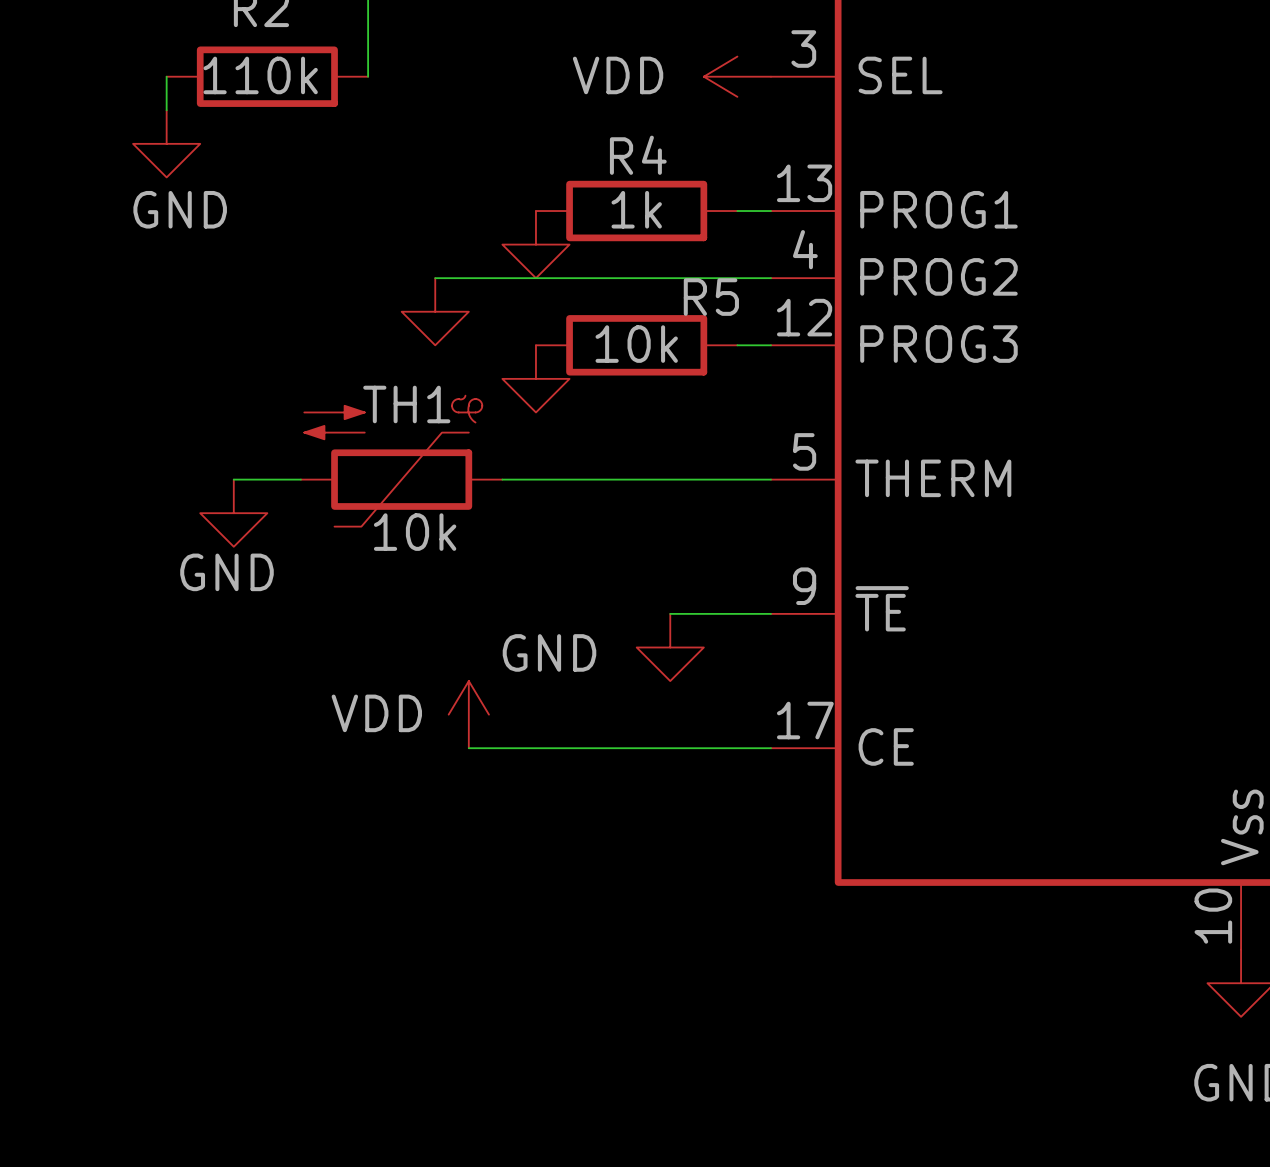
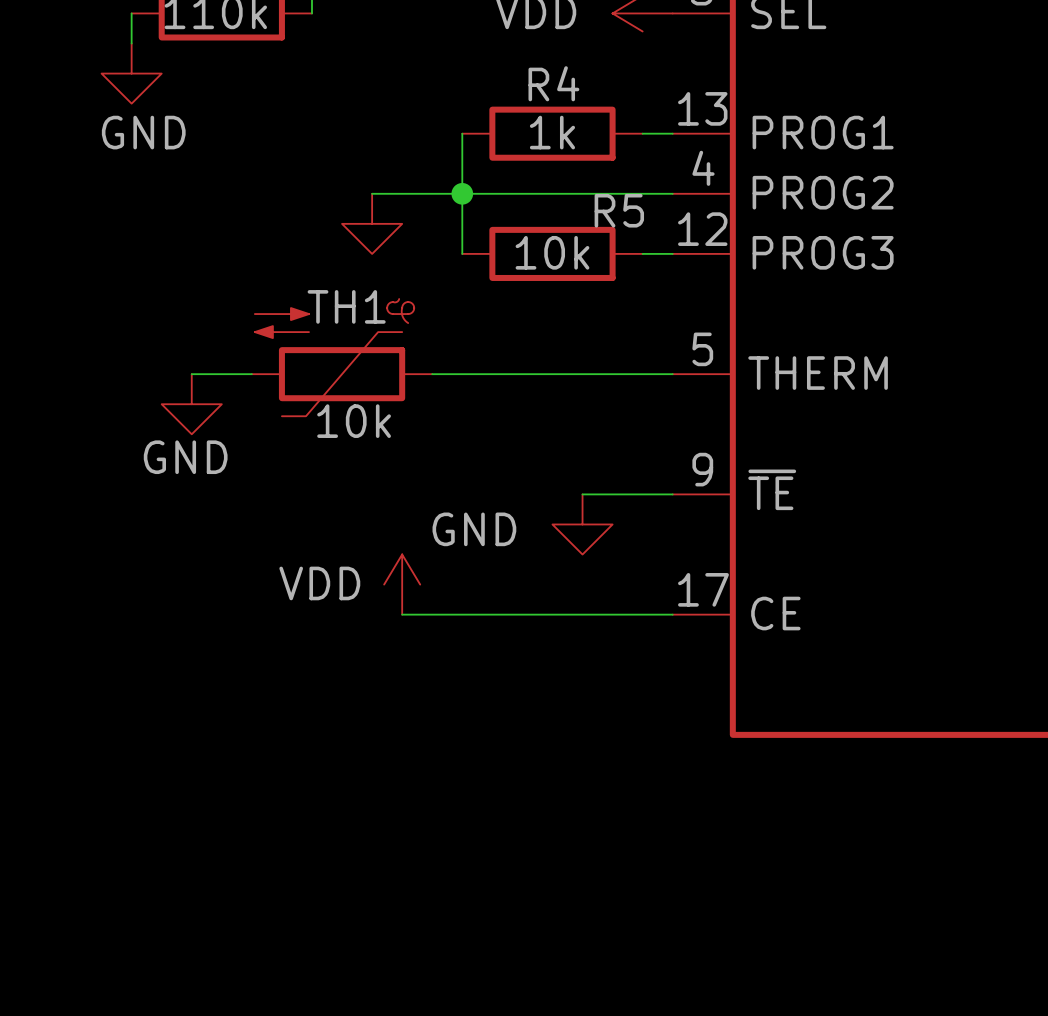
wire: none -> (462, 133) (462, 253)
power symbol: (535, 244) -> none
junction: none -> (462, 193)
power symbol: (535, 378) -> none

